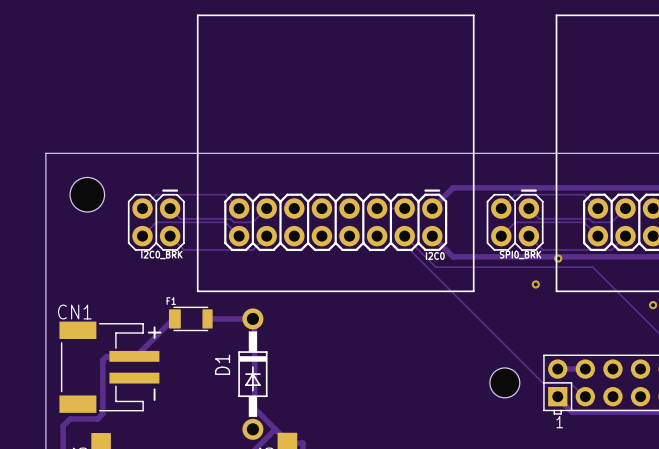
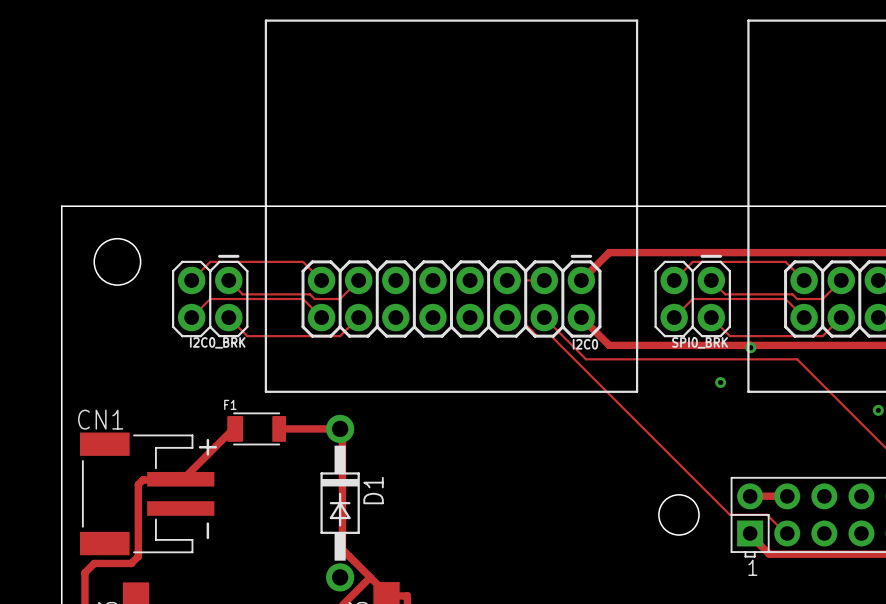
D1 name position: D1 (222, 364) -> D1 (373, 490)

